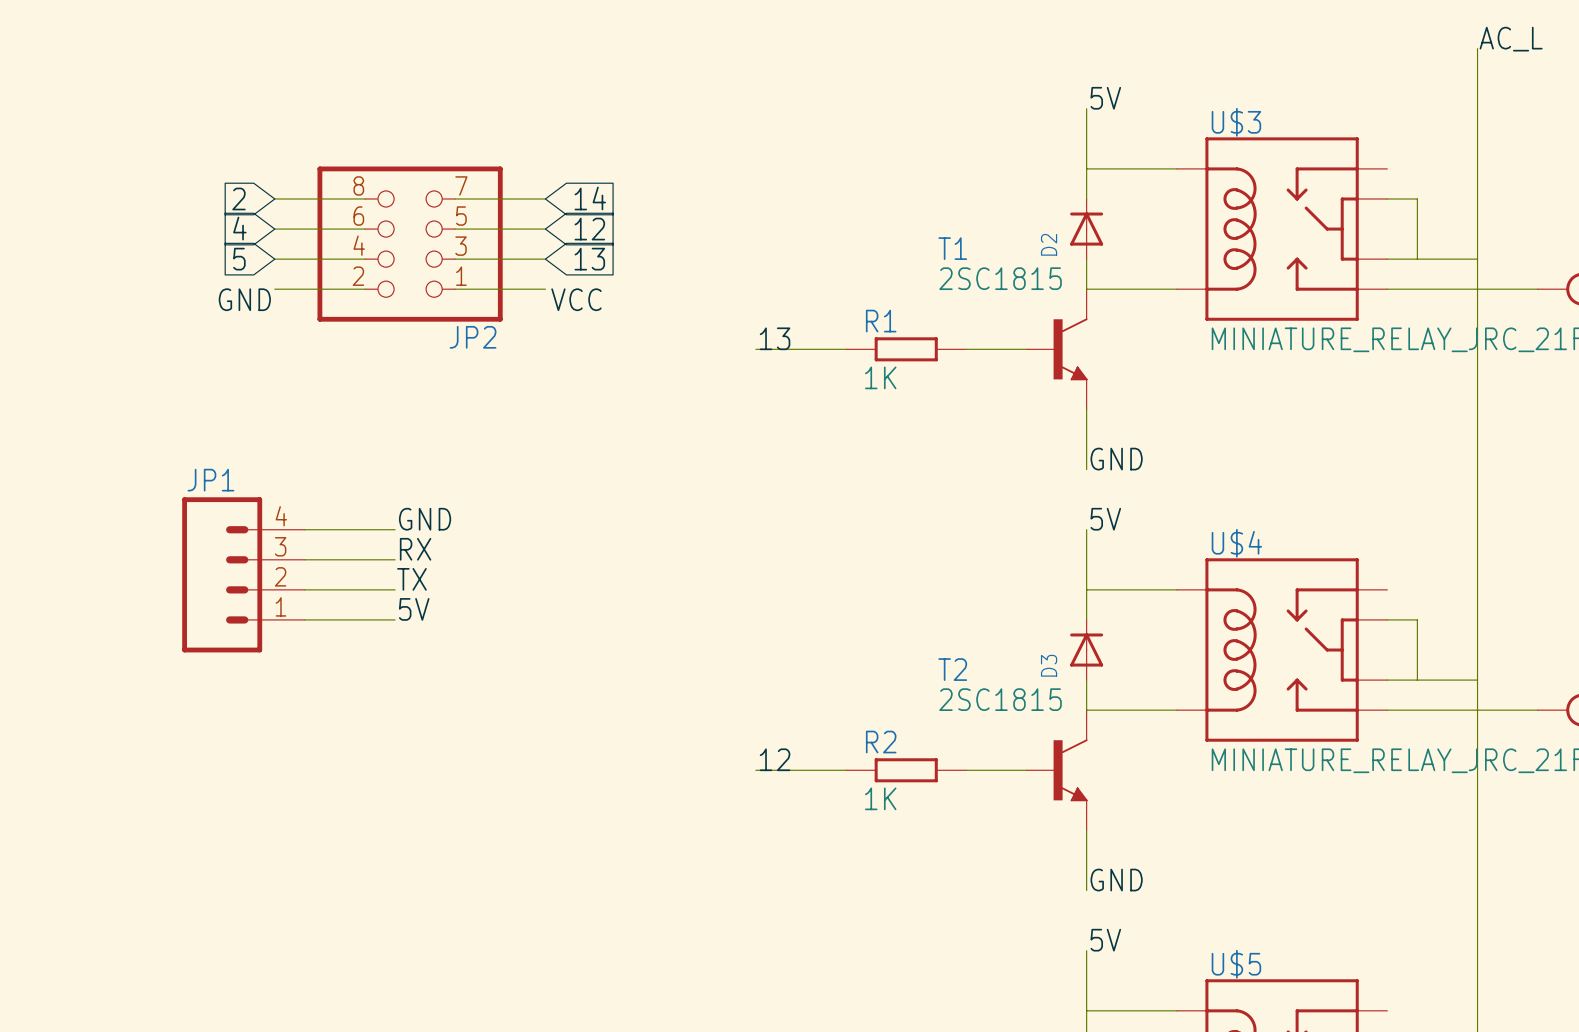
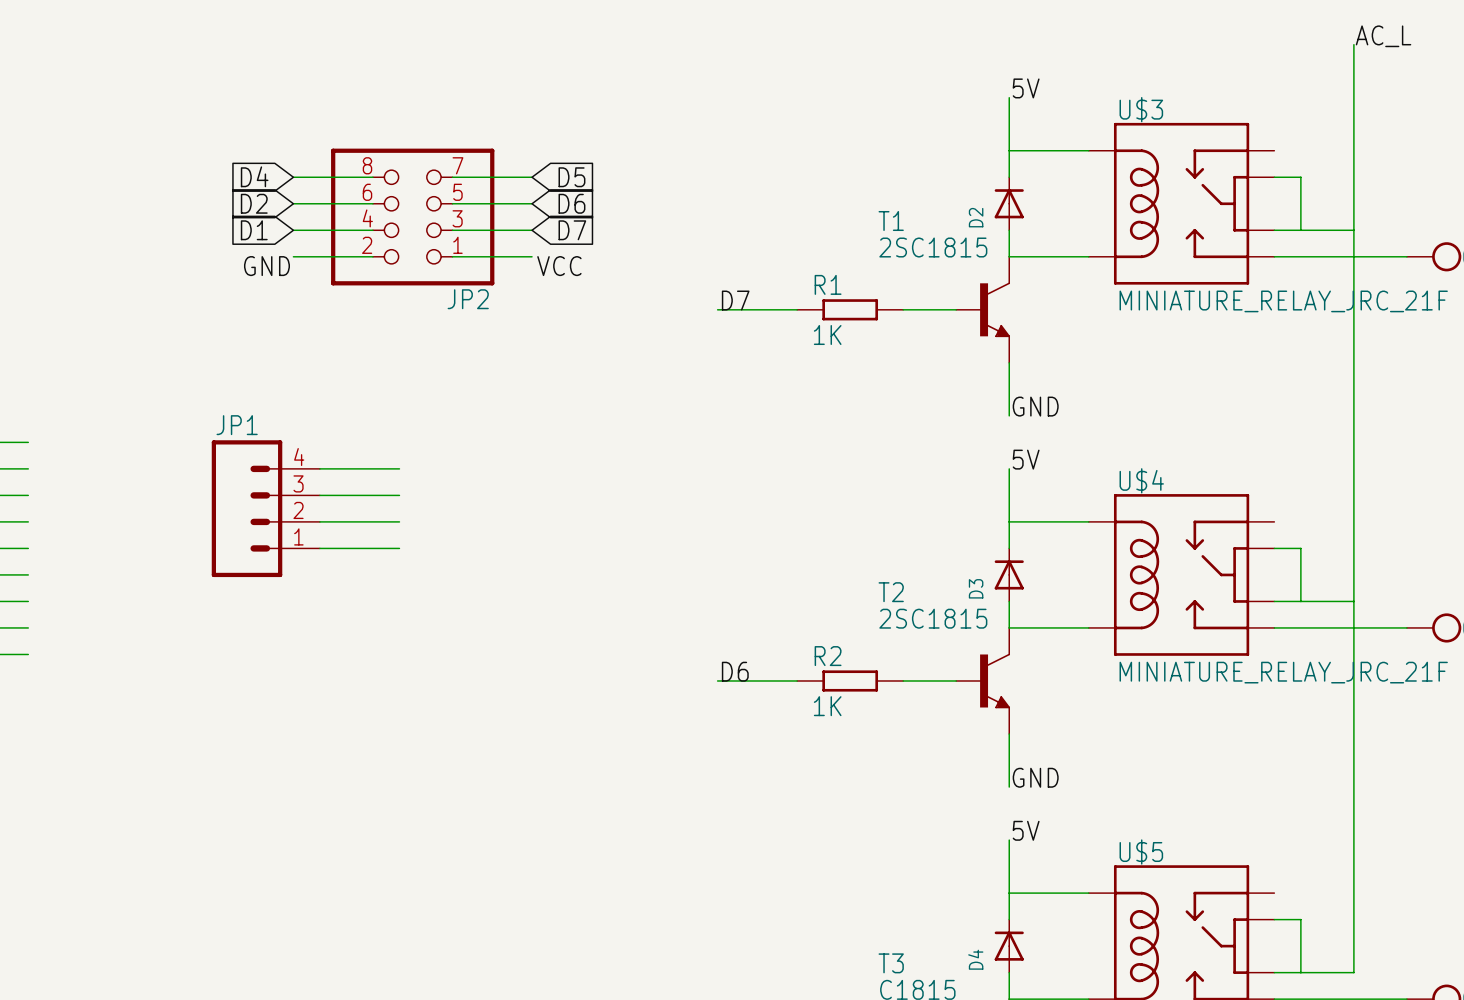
global label: 2 (238, 198) -> D4 (254, 176)
global label: 14 (590, 198) -> D5 (571, 177)
global label: 4 (239, 228) -> D2 (254, 203)
global label: 12 (589, 229) -> D6 (571, 203)
global label: 5 (239, 259) -> D1 (254, 230)
global label: 13 (589, 259) -> D7 (572, 230)
label: 13 (775, 338) -> D7 (735, 300)
label: GND (425, 519) -> none
label: RX (415, 549) -> none
label: TX (411, 579) -> none
label: 5V (414, 609) -> none
label: 12 (775, 759) -> D6 (735, 671)

